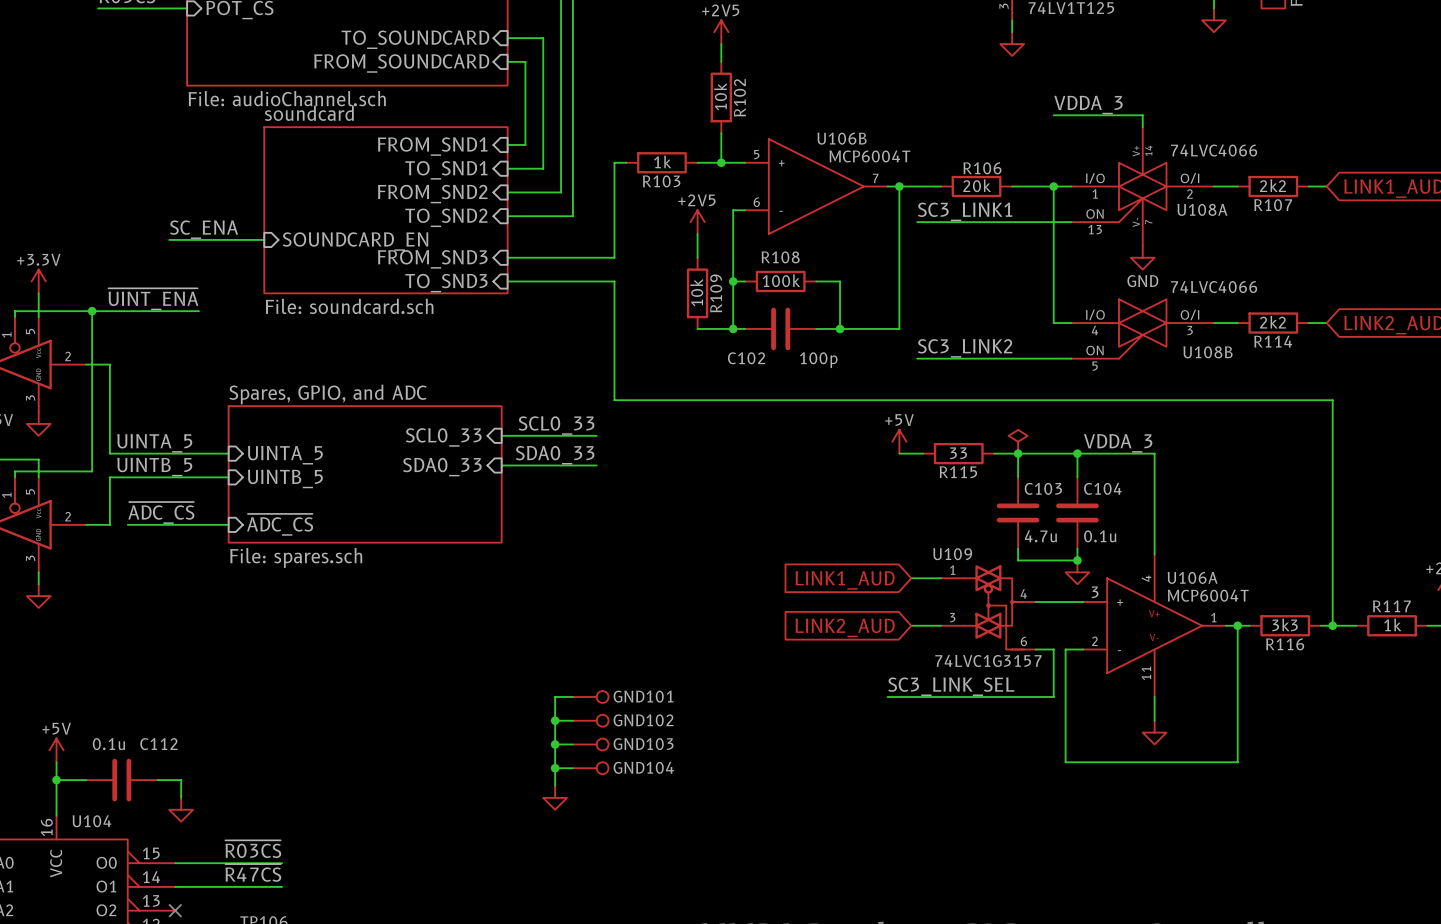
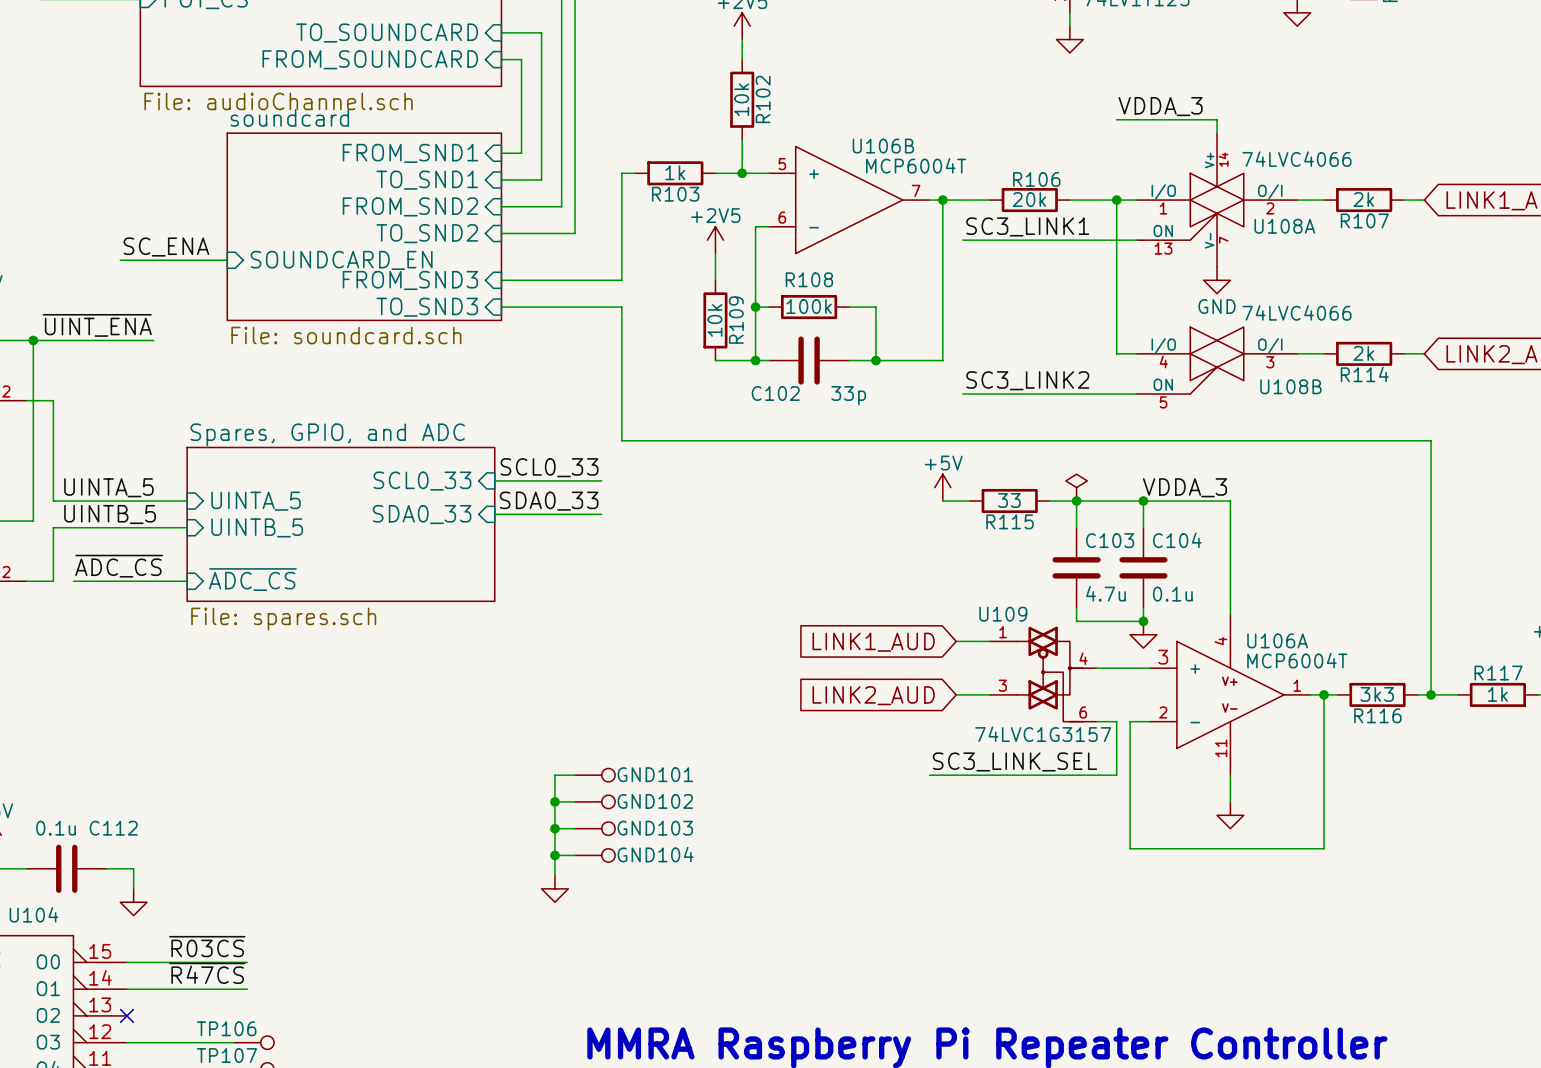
R107 value: 2k2 (1272, 185) -> 2k (1363, 199)
R114 value: 2k2 (1272, 322) -> 2k (1363, 353)
C102 value: 100p (818, 360) -> 33p (848, 395)

